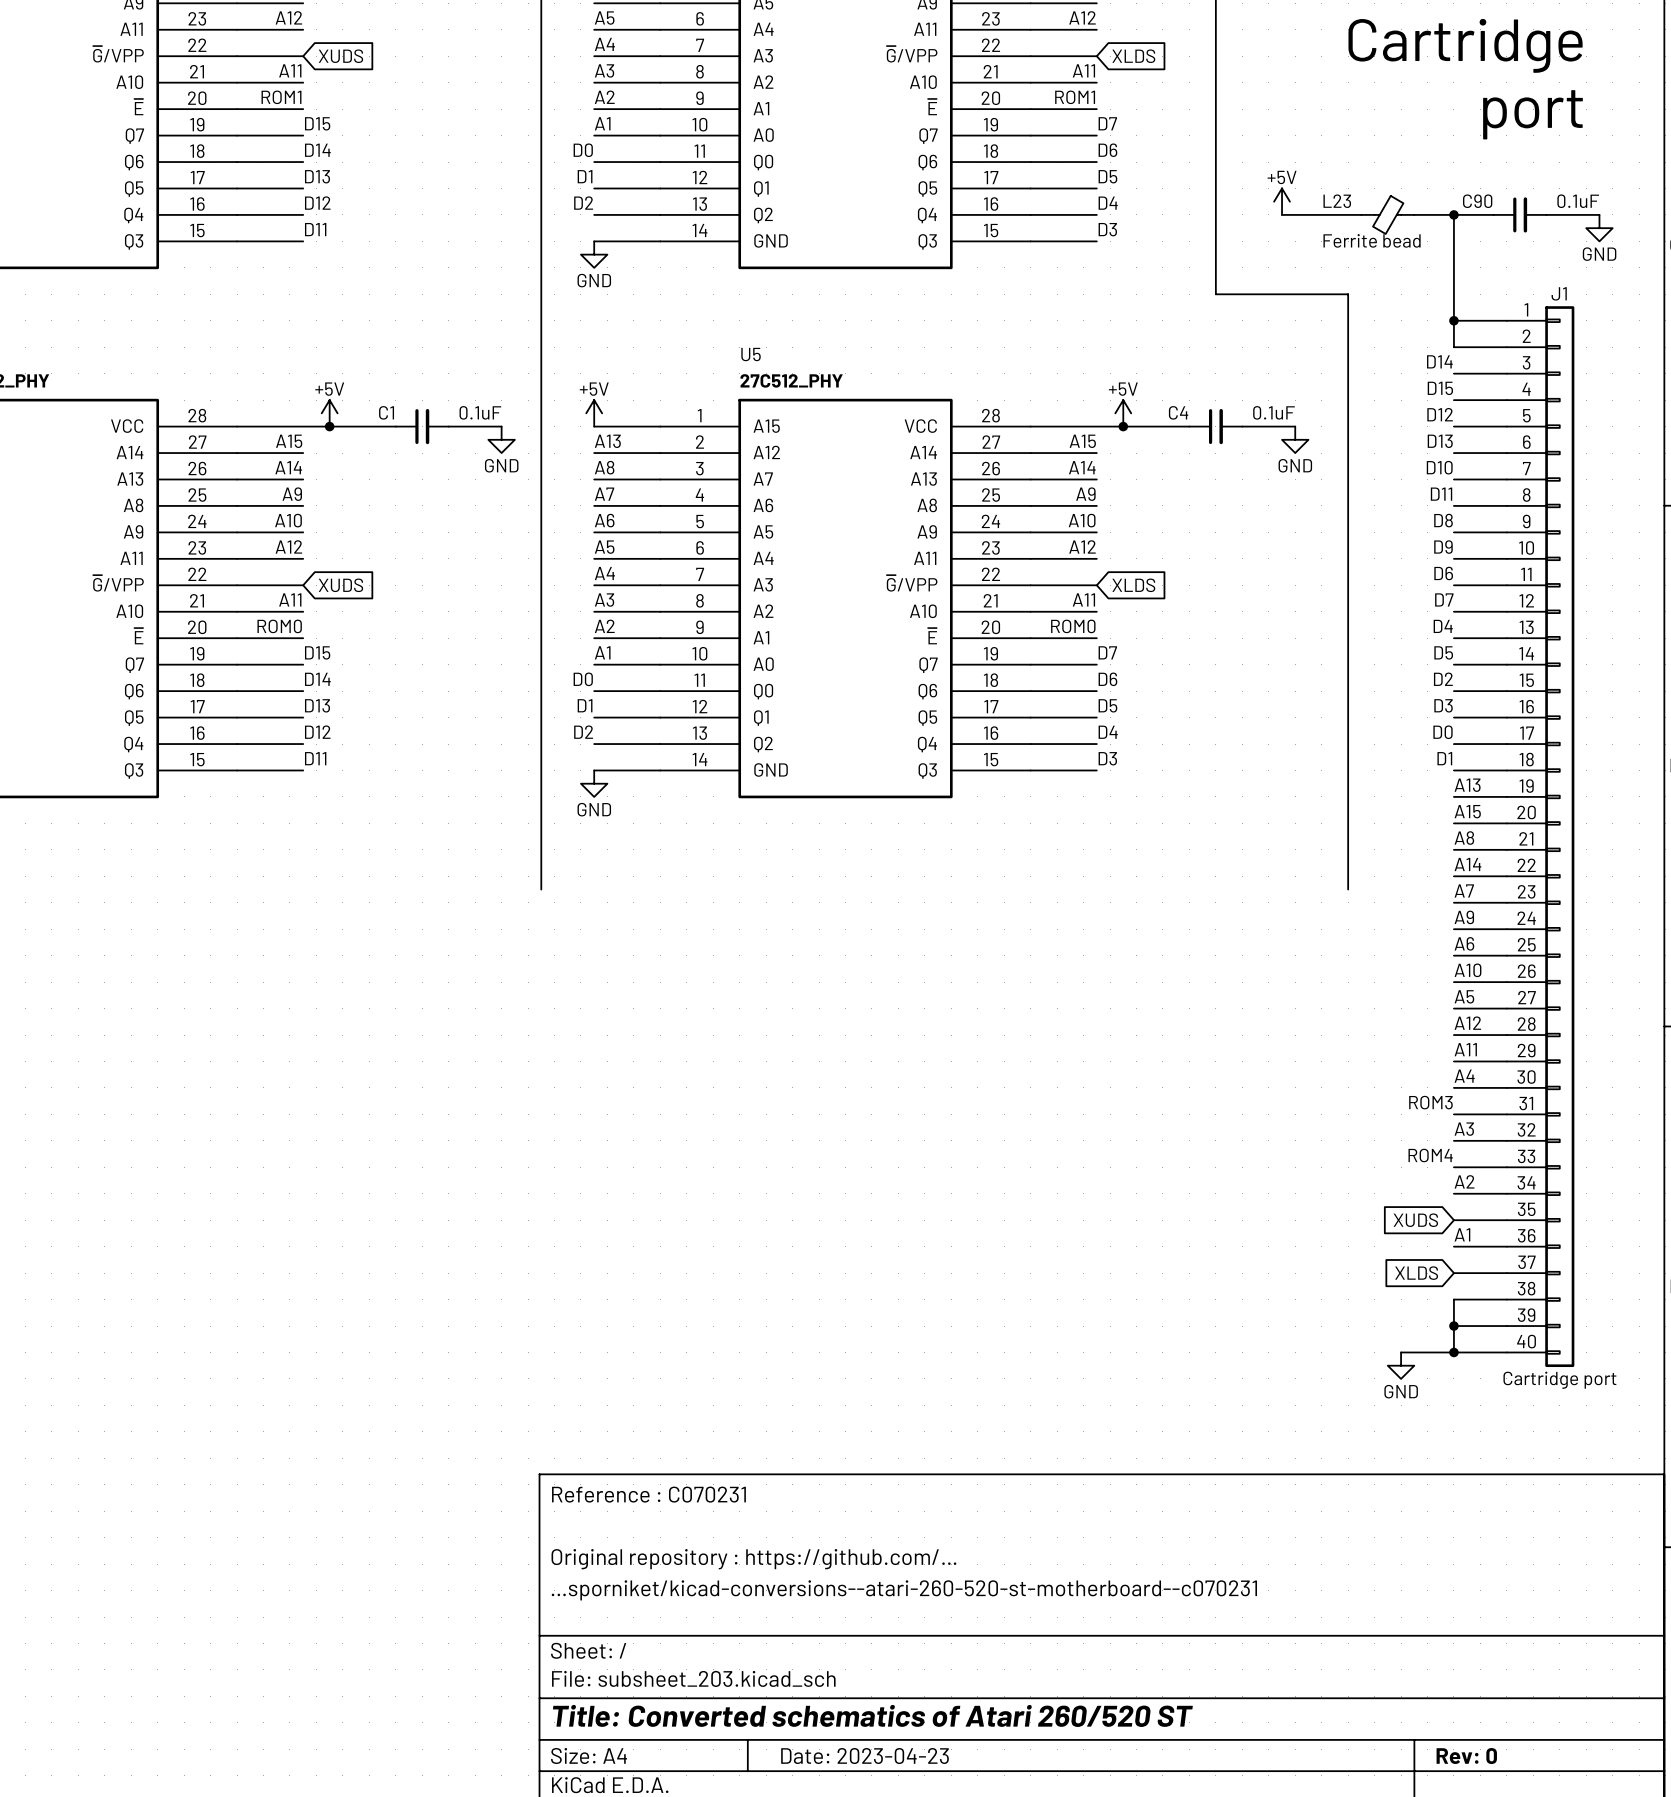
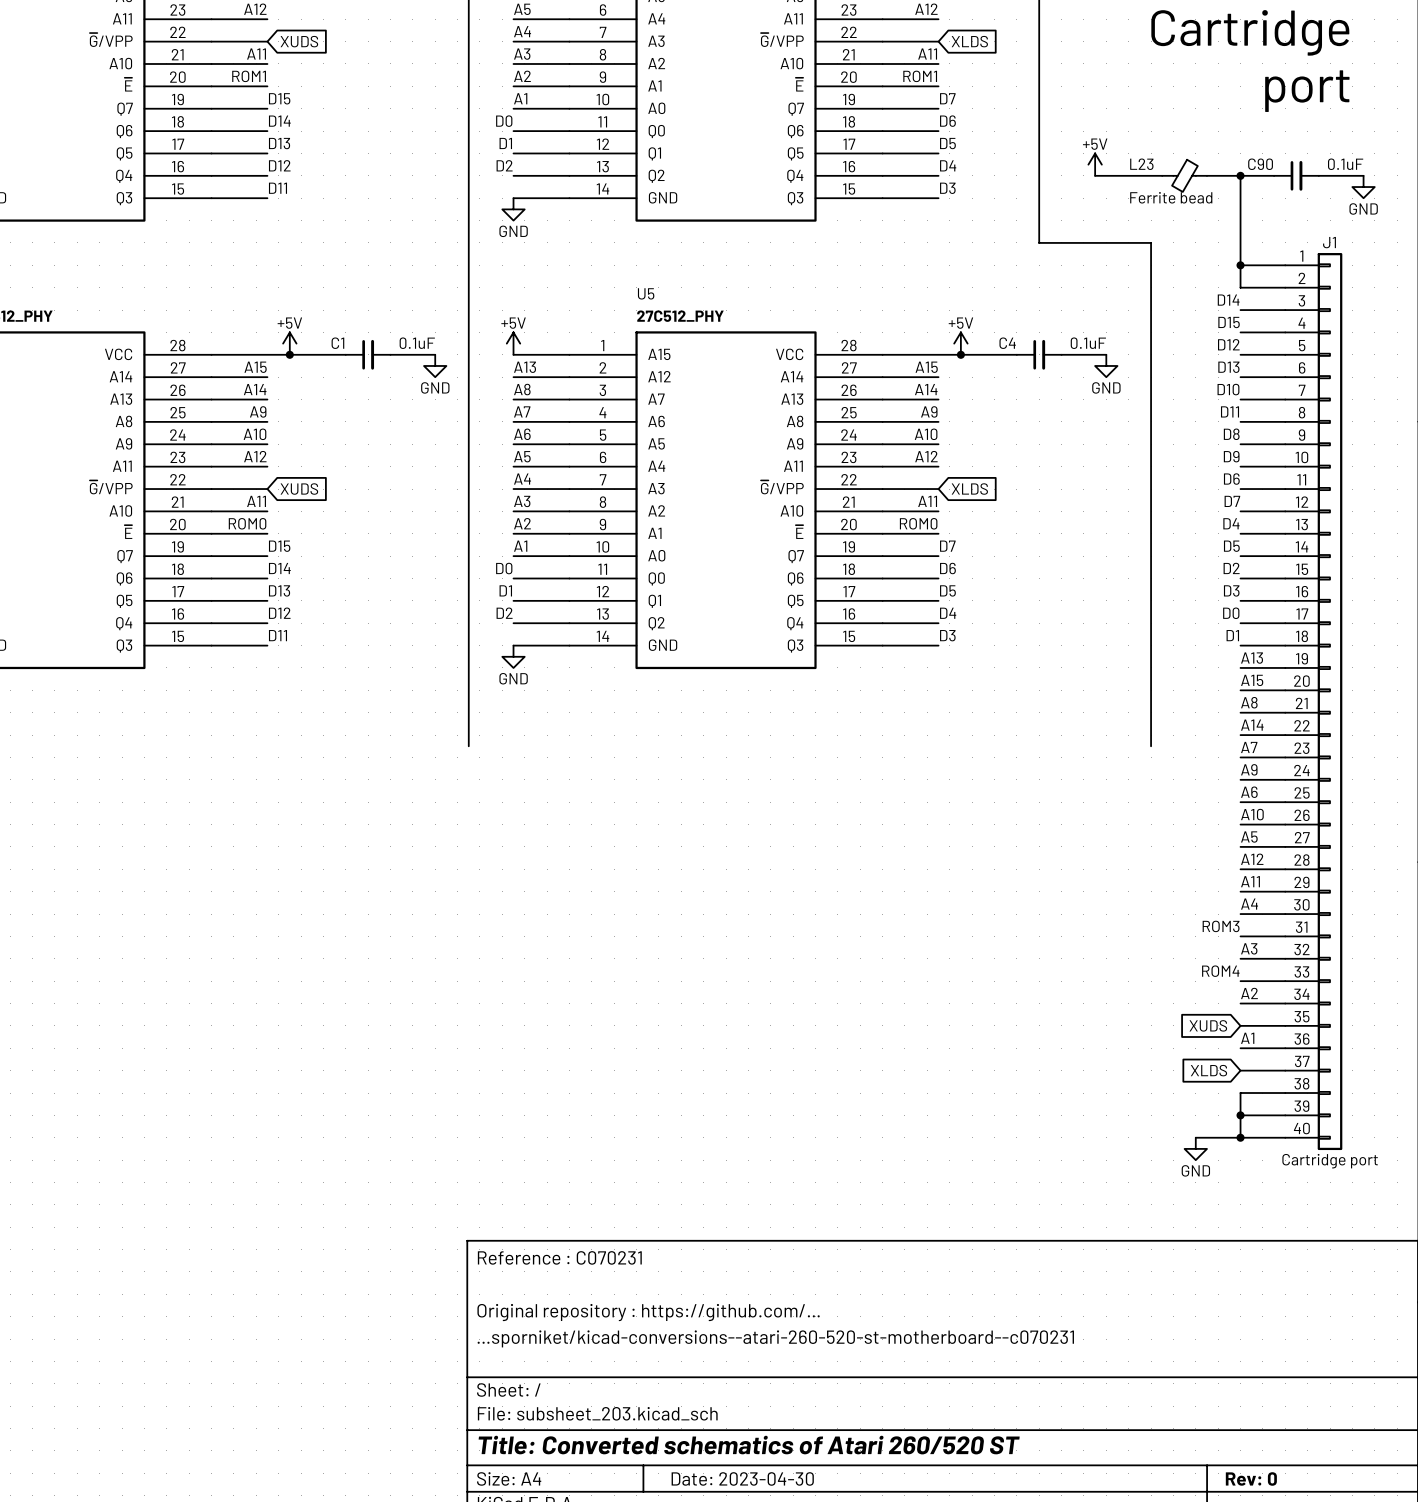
title block: Date: 2023-04-23 (865, 1756) -> Date: 2023-04-30 (742, 1478)

